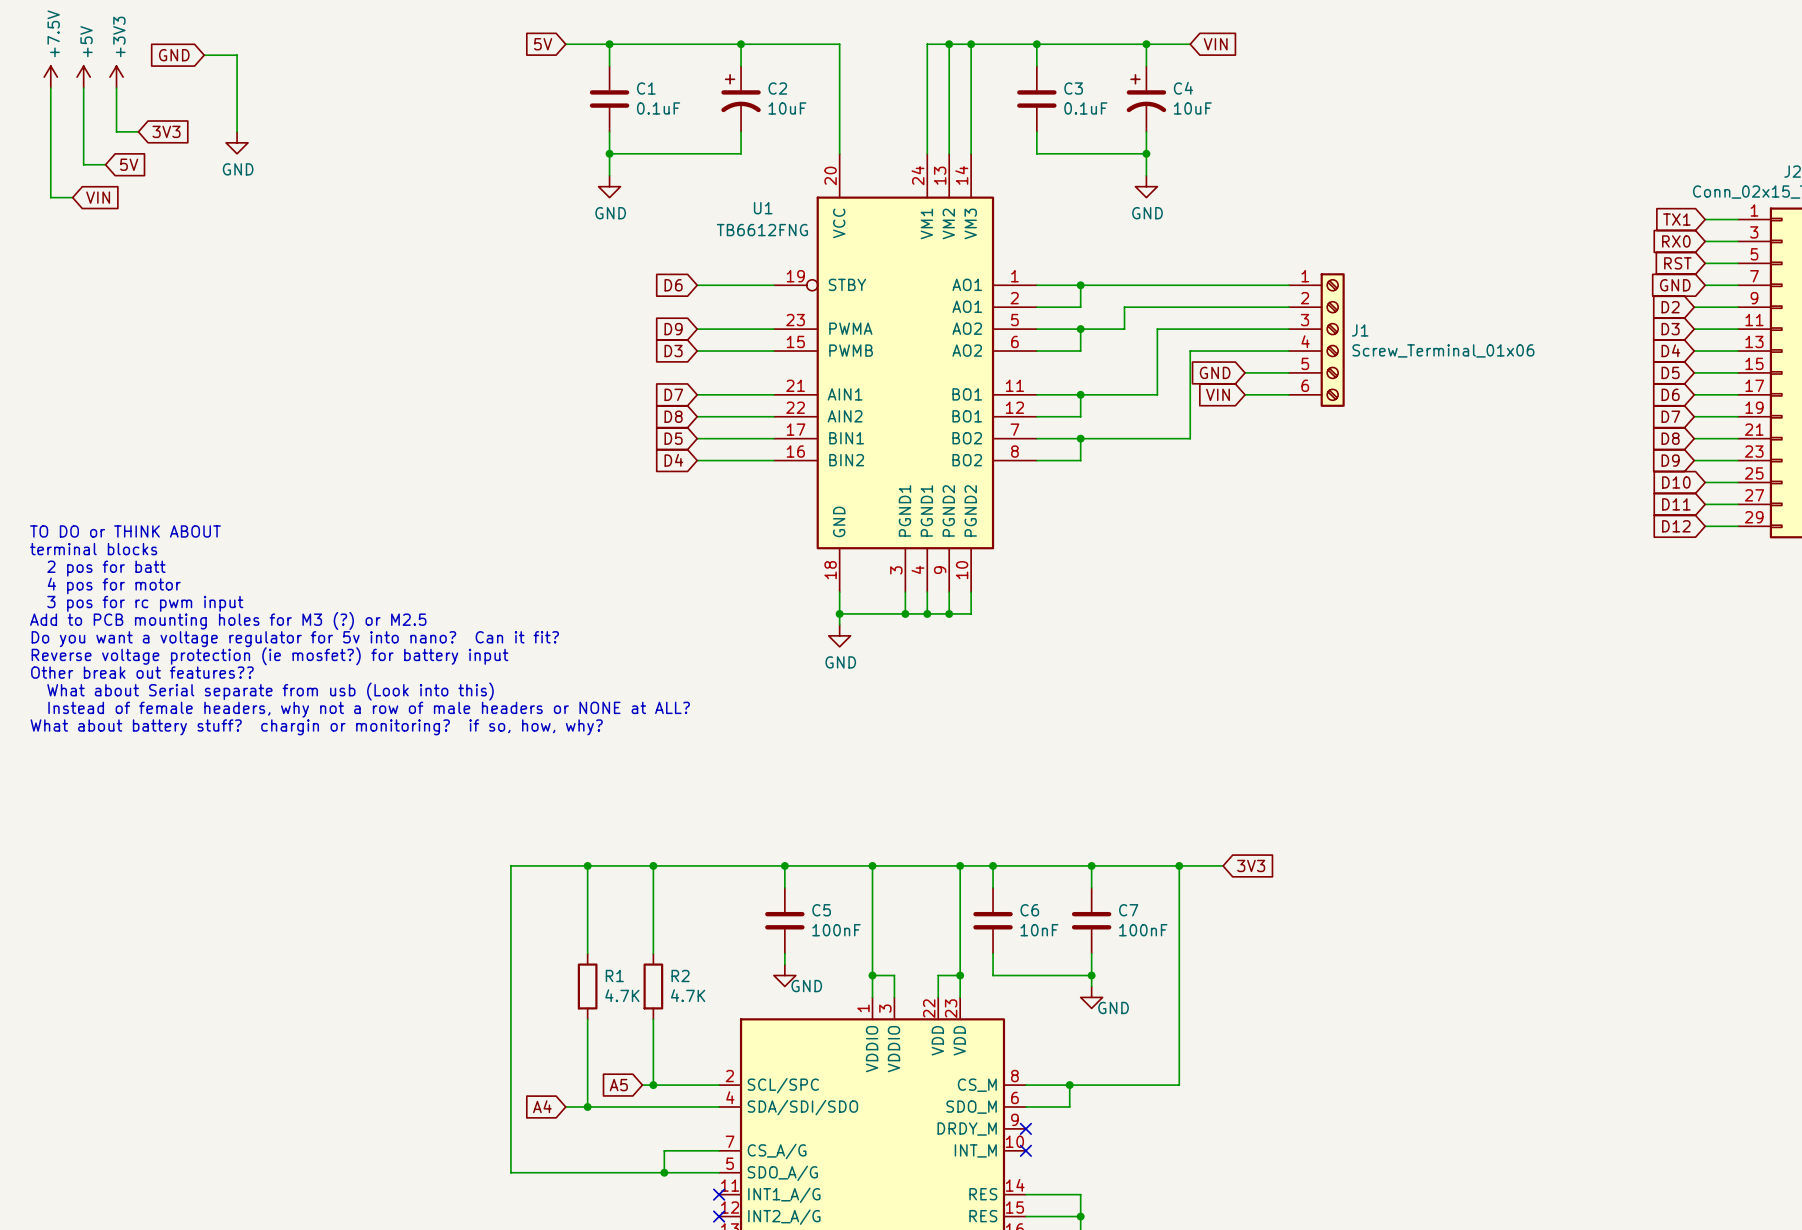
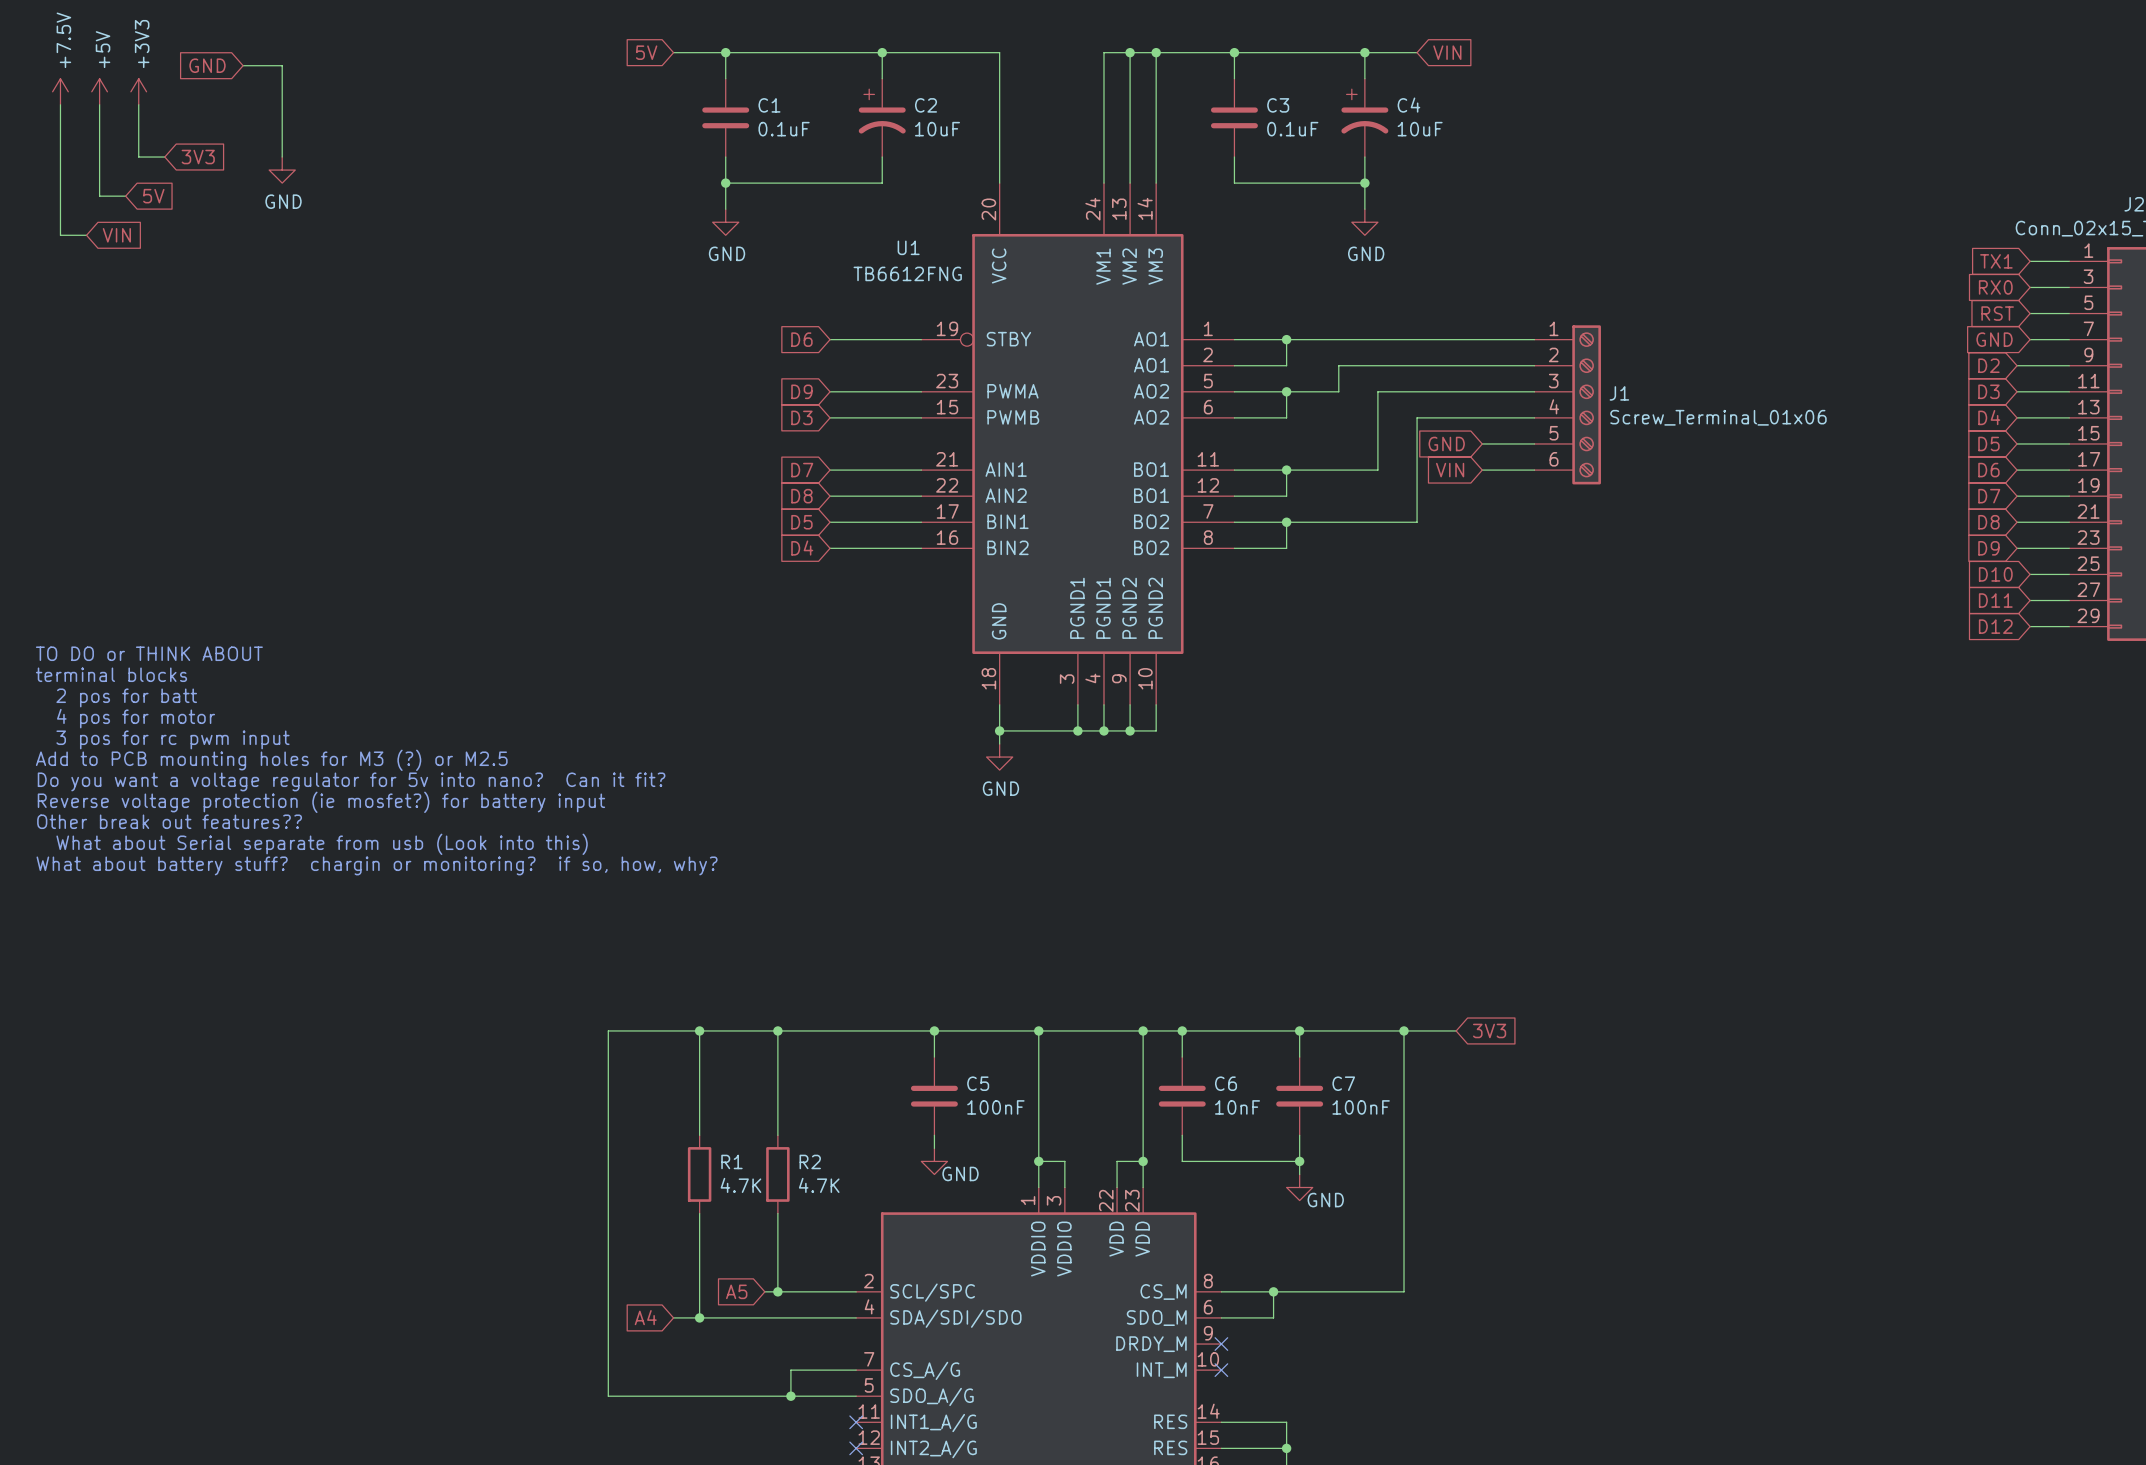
text: TO DO or THINK ABOUT (125, 531) -> none
text: terminal blocks (93, 549) -> TO DO or THINK ABOUT (149, 653)
text: 2 pos for batt (106, 568) -> terminal blocks (111, 674)
text: 4 pos for motor (114, 585) -> 2 pos for batt (126, 697)
text: 3 pos for rc pwm input (145, 603) -> 4 pos for motor (136, 718)
text: Add to PCB mounting holes for M3 (?) or M2.5 (228, 620) -> 3 pos for rc pwm input (172, 739)
text: Do you want a voltage regulator for 5v into nano? Can it fit? (295, 639) -> Add to PCB mounting holes for M3 (?) or M2.5 (271, 760)
text: Reverse voltage protection (ie mosfet?) for battery input (269, 656) -> Do you want a voltage regulator for 5v into nano? Can it fit? (351, 781)
text: Other break out features?? (142, 672) -> Reverse voltage protection (ie mosfet?) for battery input (321, 802)
text: What about Serial separate from usb (Look into this) (270, 691) -> Other break out features?? (169, 821)
text: Instead of female headers, why not a row of male headers or NONE at ALL? (369, 709) -> What about Serial separate from usb (Look into this) (322, 844)

